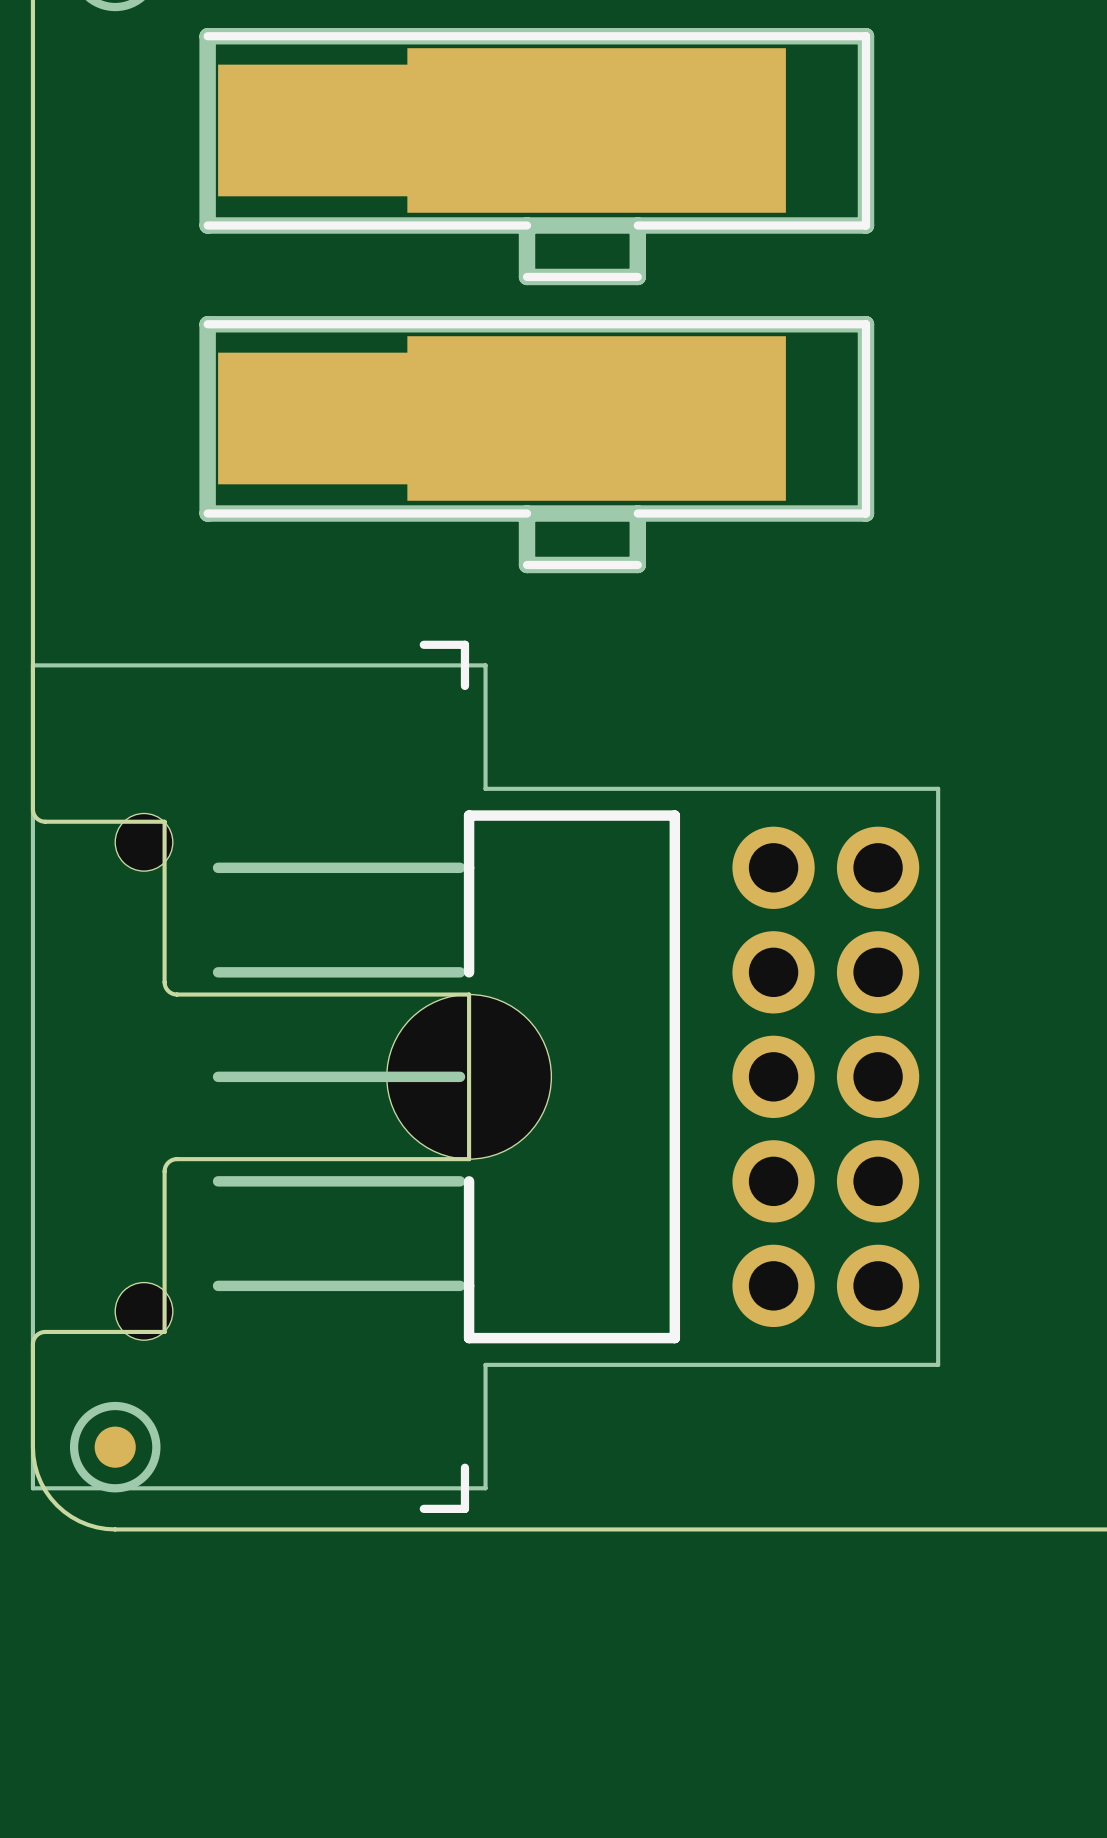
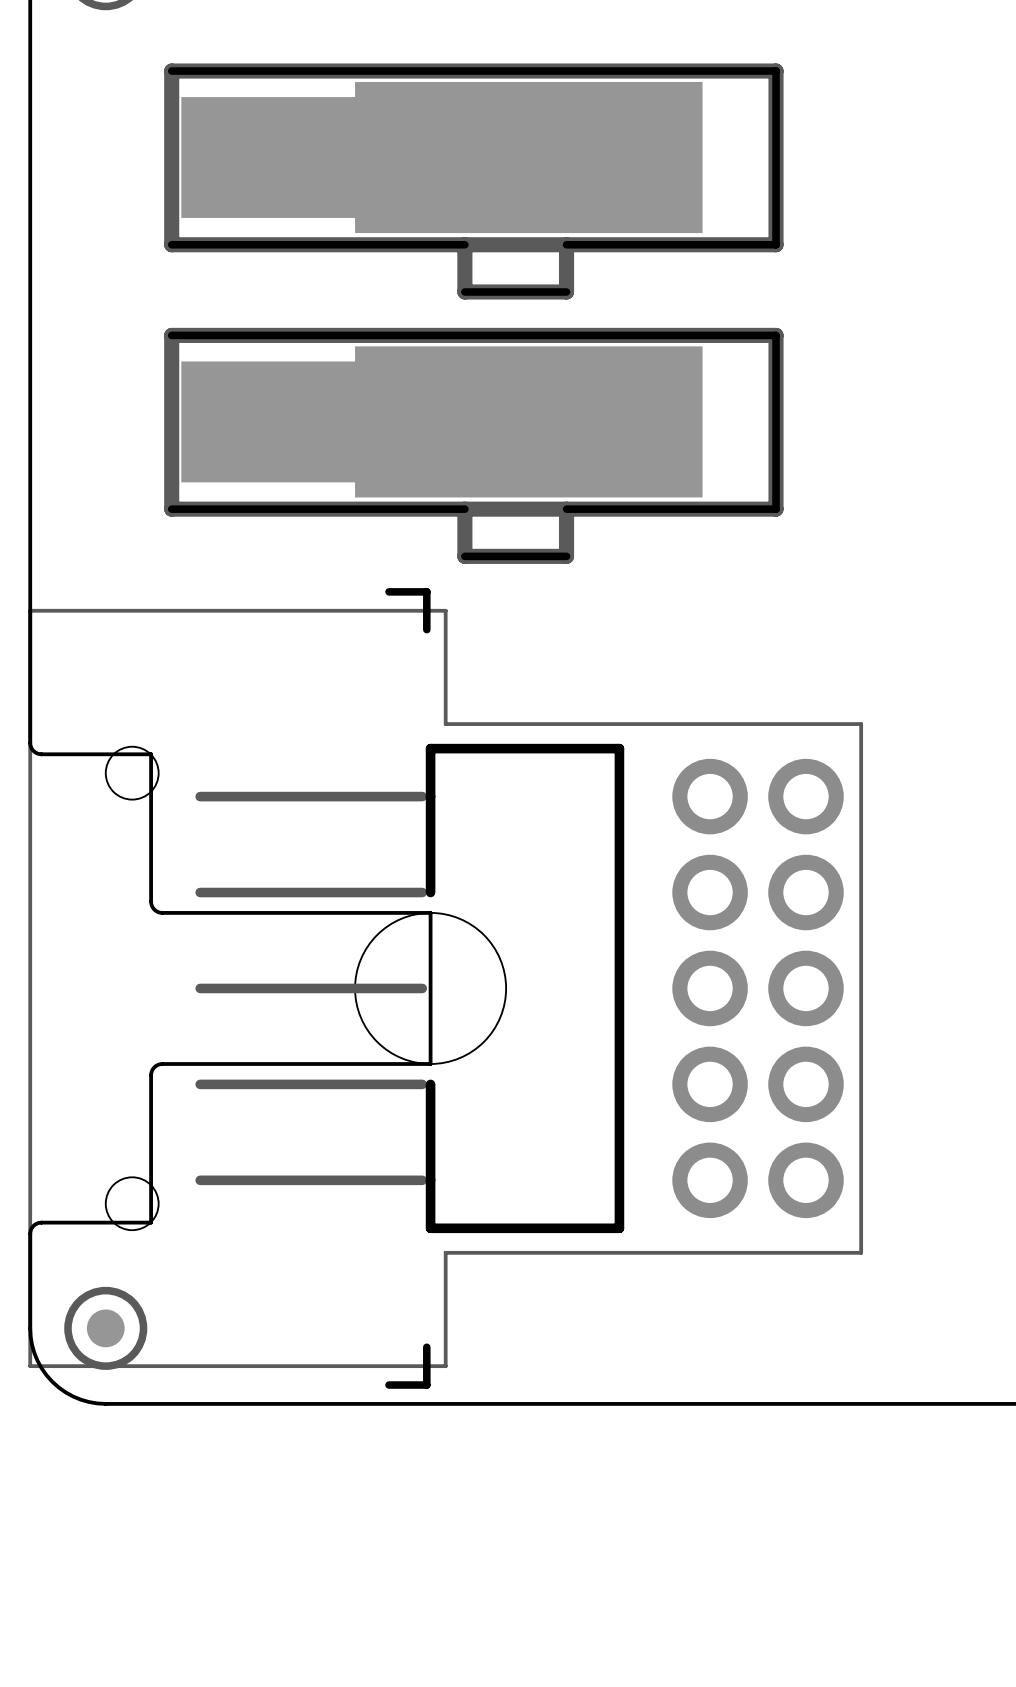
part position: (536, 156) -> (473, 181)
part position: (536, 444) -> (473, 445)

